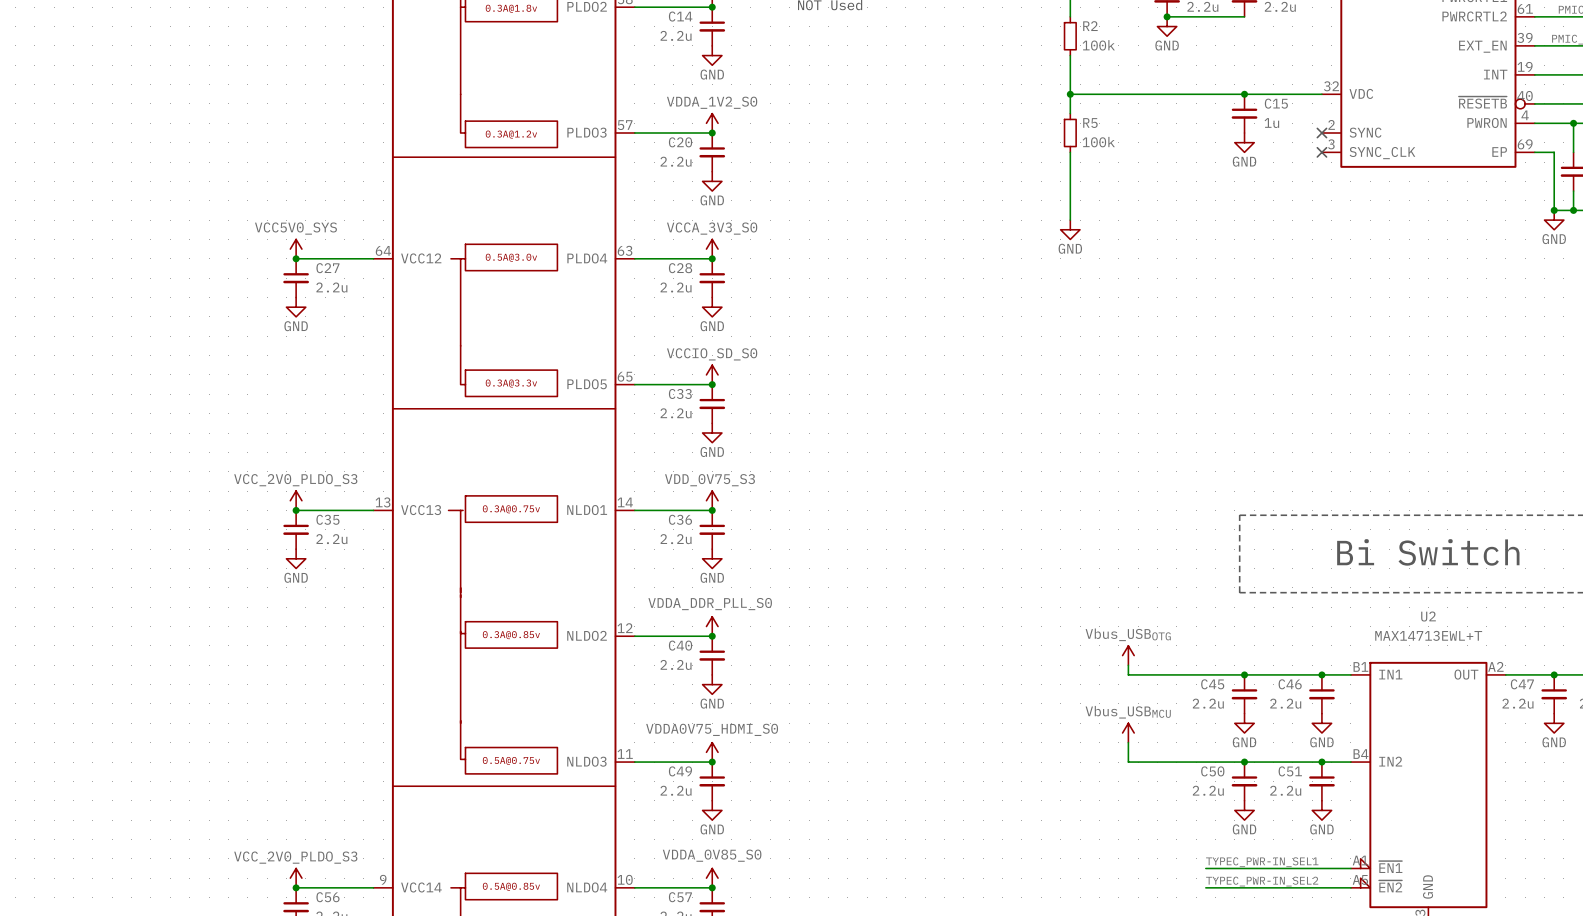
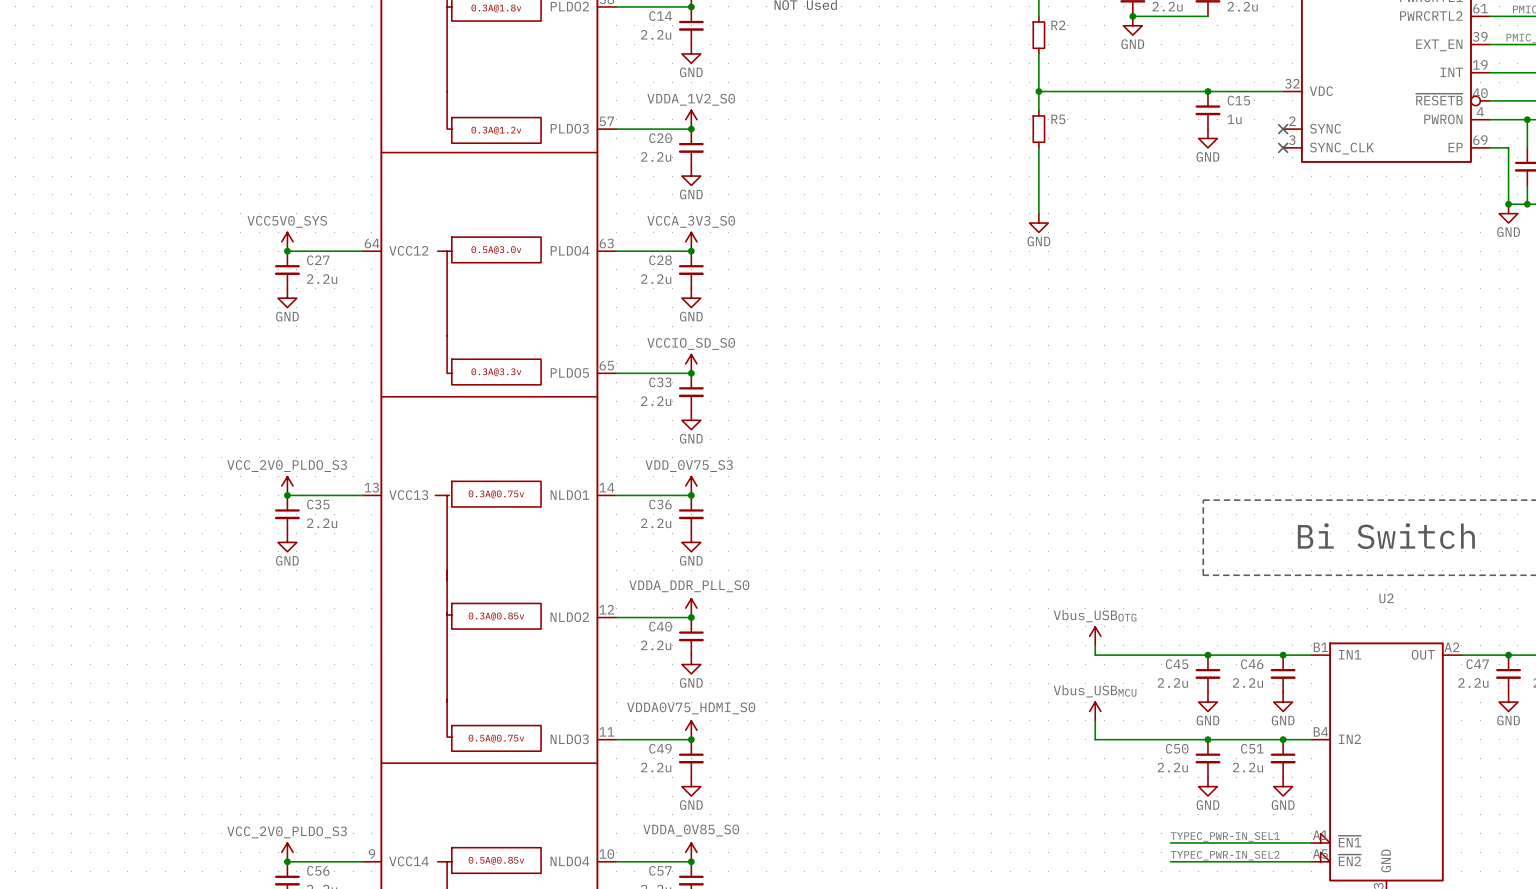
R2 value: 100k (1098, 45) -> none
R5 value: 100k (1098, 142) -> none
U2 value: MAX14713EWL+T (1428, 635) -> none

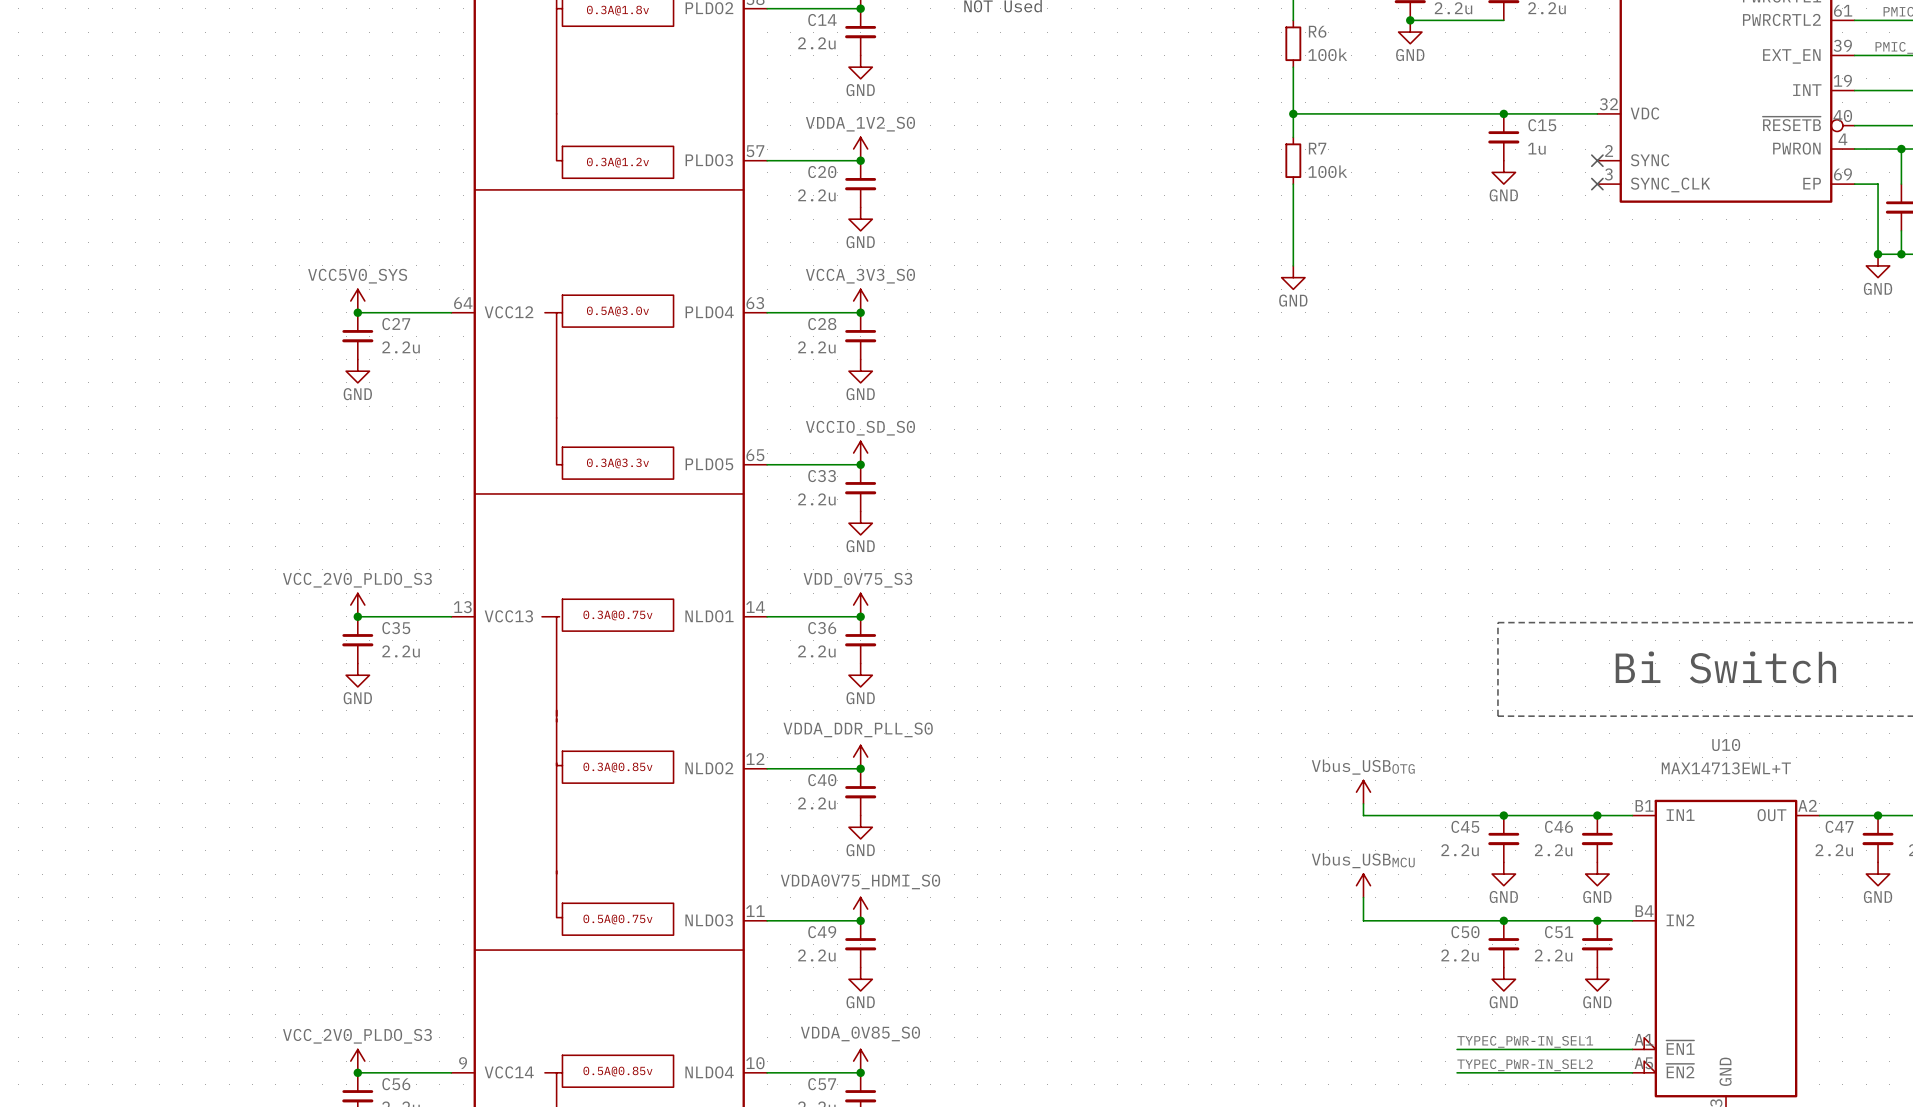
R2 name: R2 (1058, 25) -> R6 (1317, 31)
R2 value: none -> 100k (1327, 54)
R5 name: R5 (1058, 119) -> R7 (1317, 148)
R5 value: none -> 100k (1327, 171)
U2 name: U2 (1386, 598) -> U10 (1726, 744)
U2 value: none -> MAX14713EWL+T (1726, 768)

